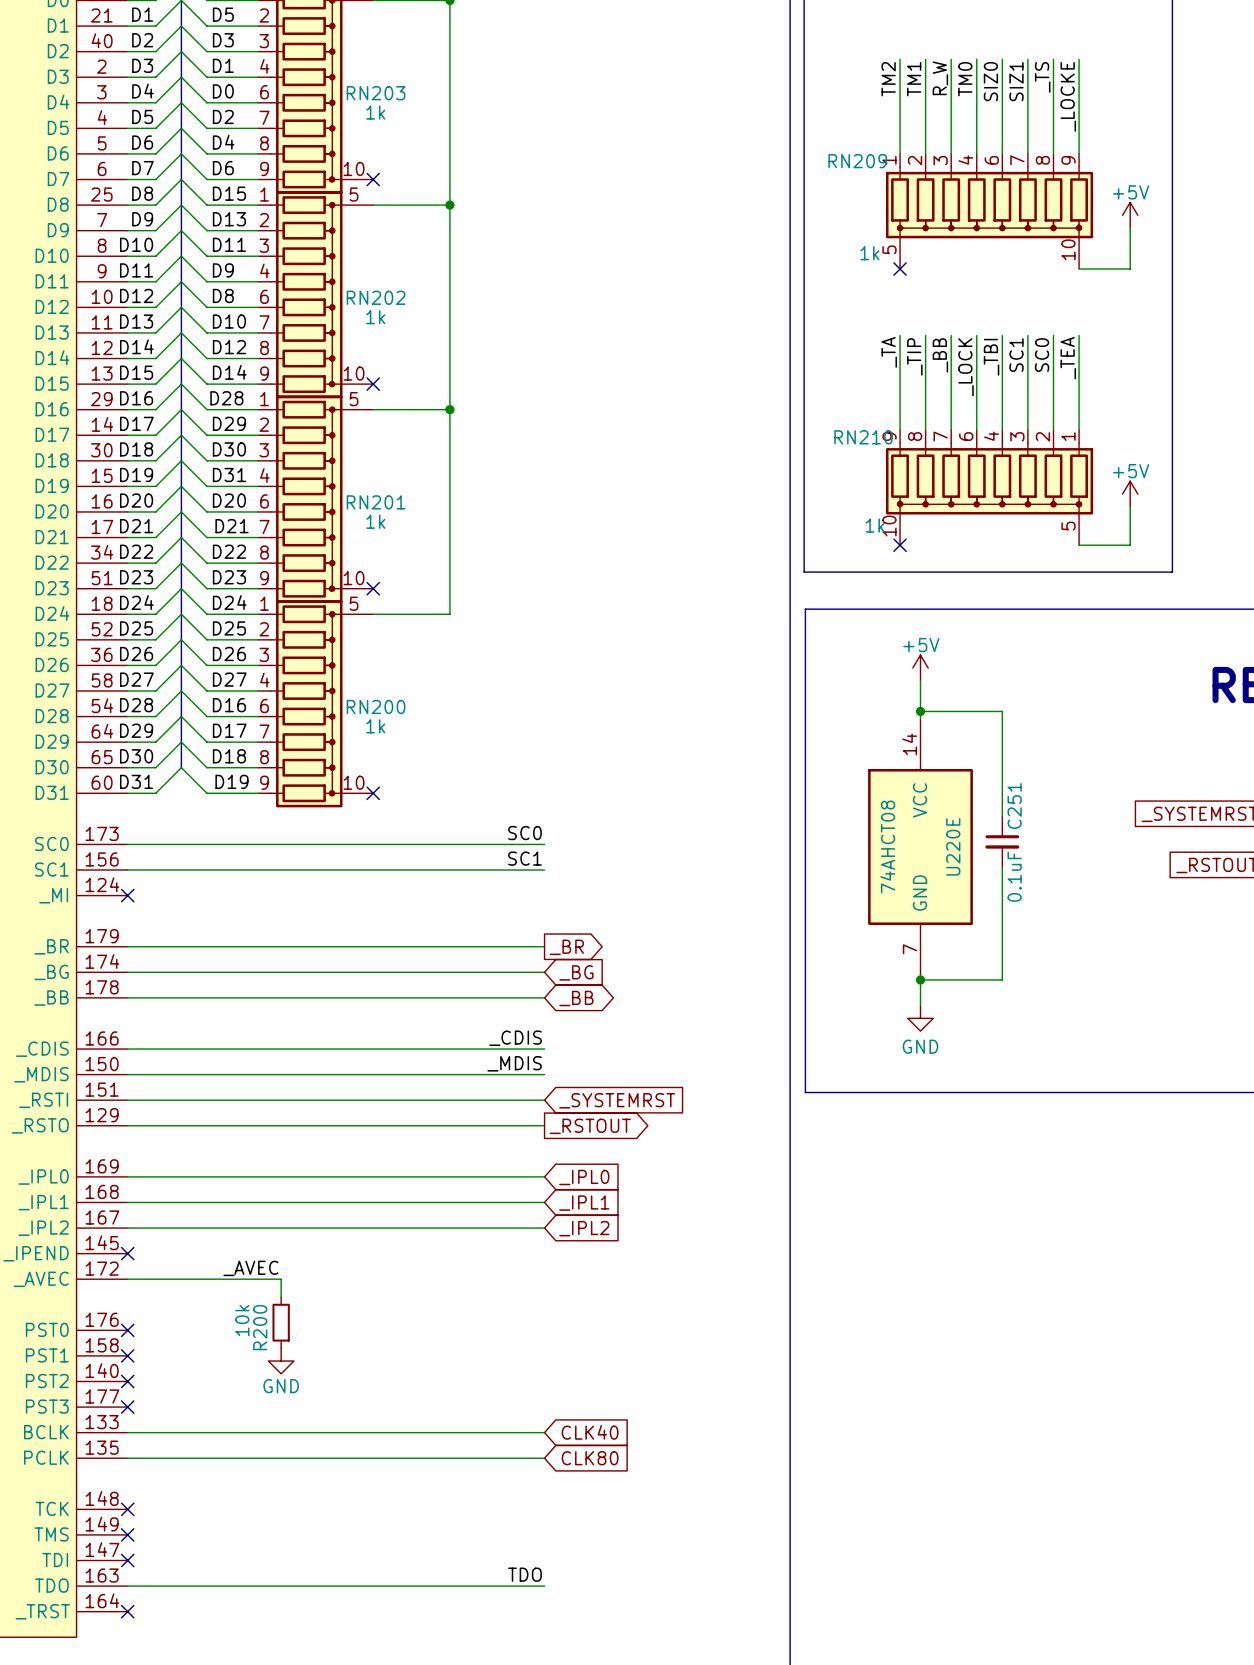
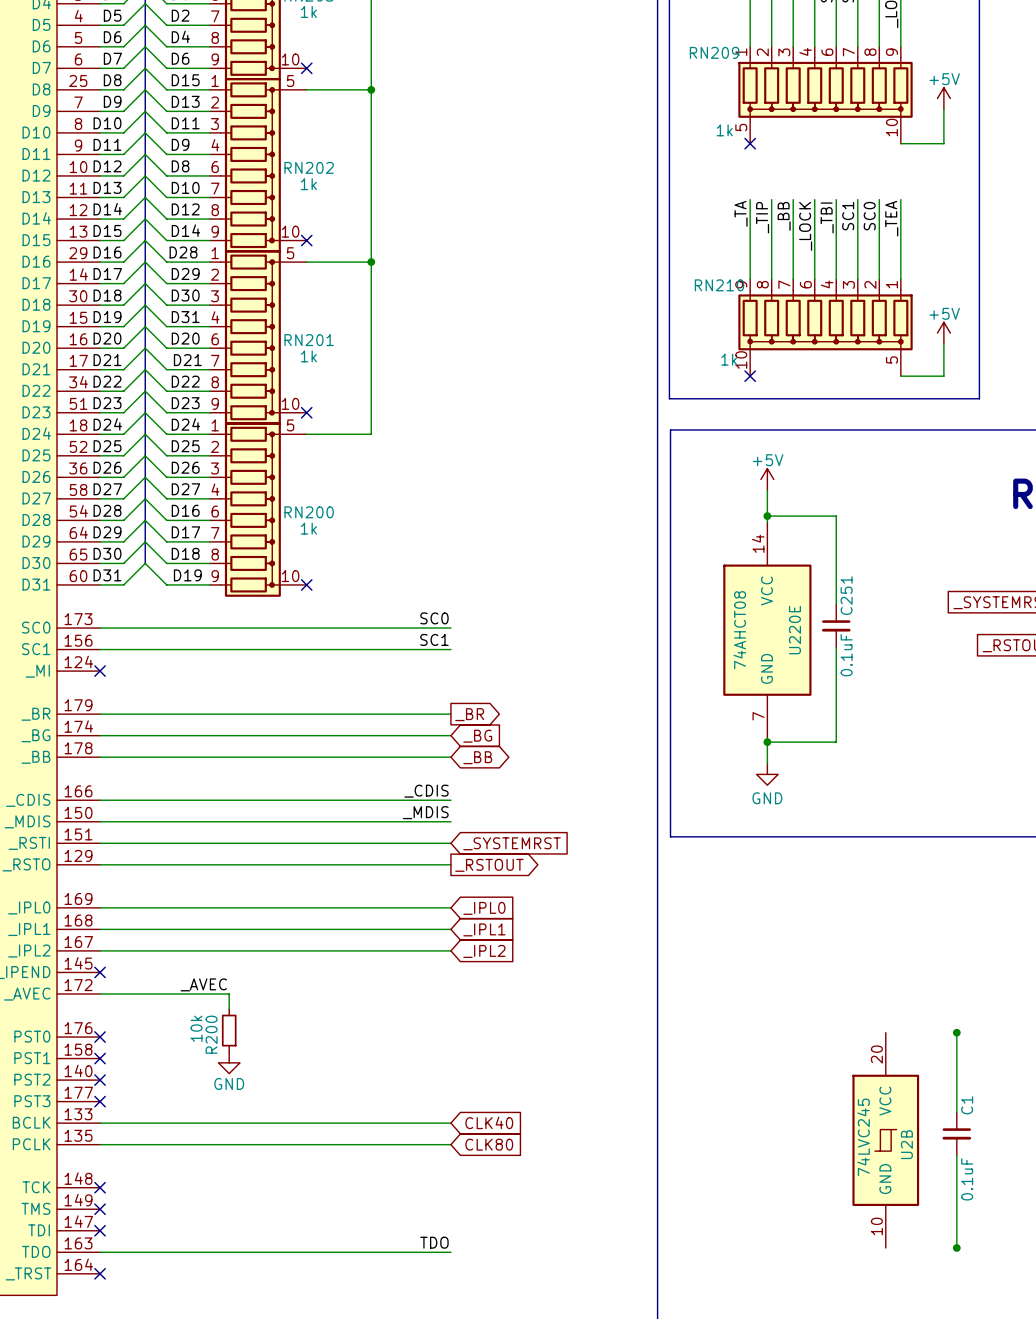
wire: none -> (956, 1032) (956, 1112)
junction: none -> (956, 1032)
C1: none -> 0.1uF (956, 1133)
U2B: none -> 74LVC245 (885, 1140)
wire: none -> (956, 1155) (956, 1247)
junction: none -> (956, 1247)

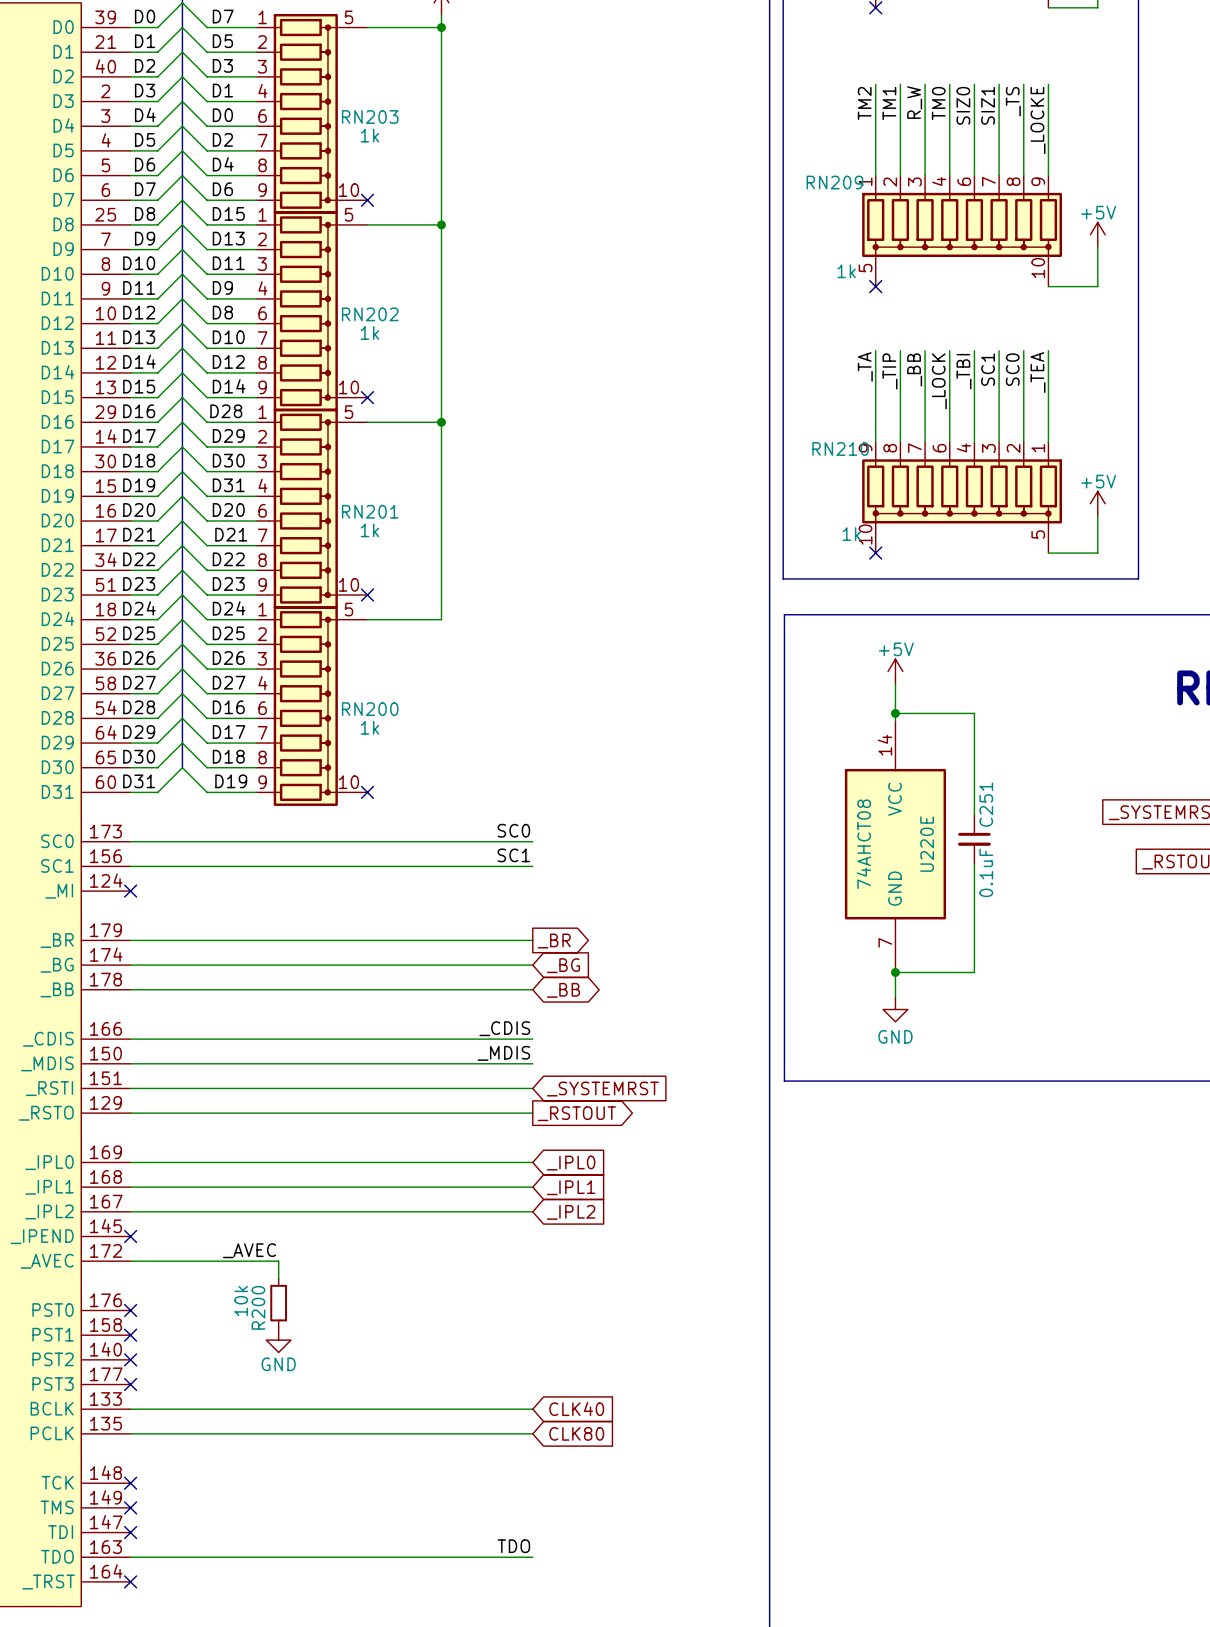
wire: (956, 1032) (956, 1112) -> none
junction: (956, 1032) -> none
C1: 0.1uF (956, 1133) -> none
U2B: 74LVC245 (885, 1140) -> none
wire: (956, 1155) (956, 1247) -> none
junction: (956, 1247) -> none

